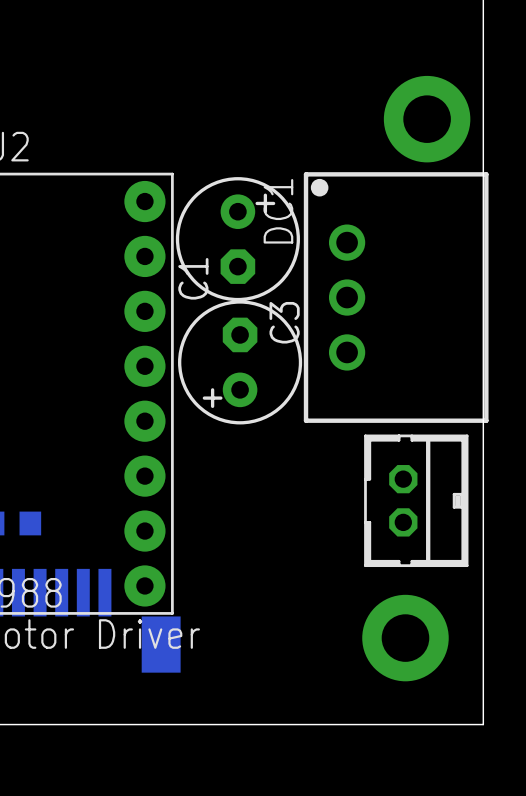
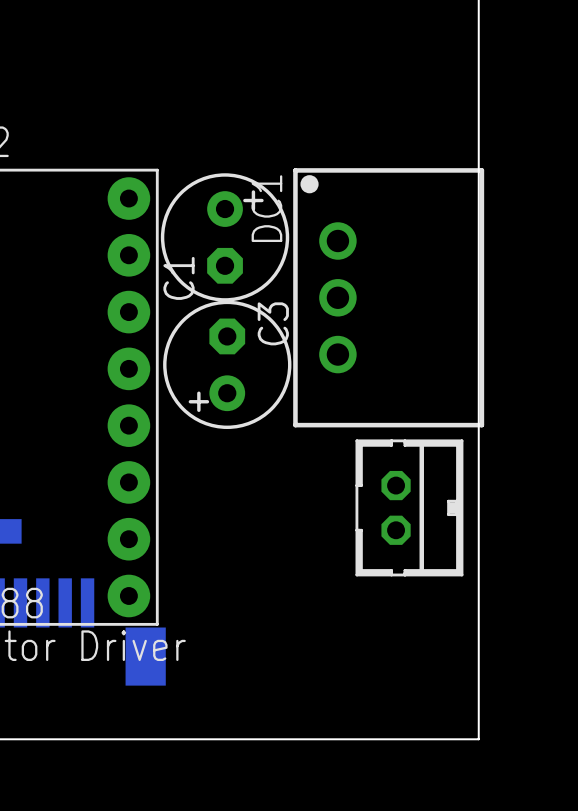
via: (427, 119) -> none
via: (405, 638) -> none

